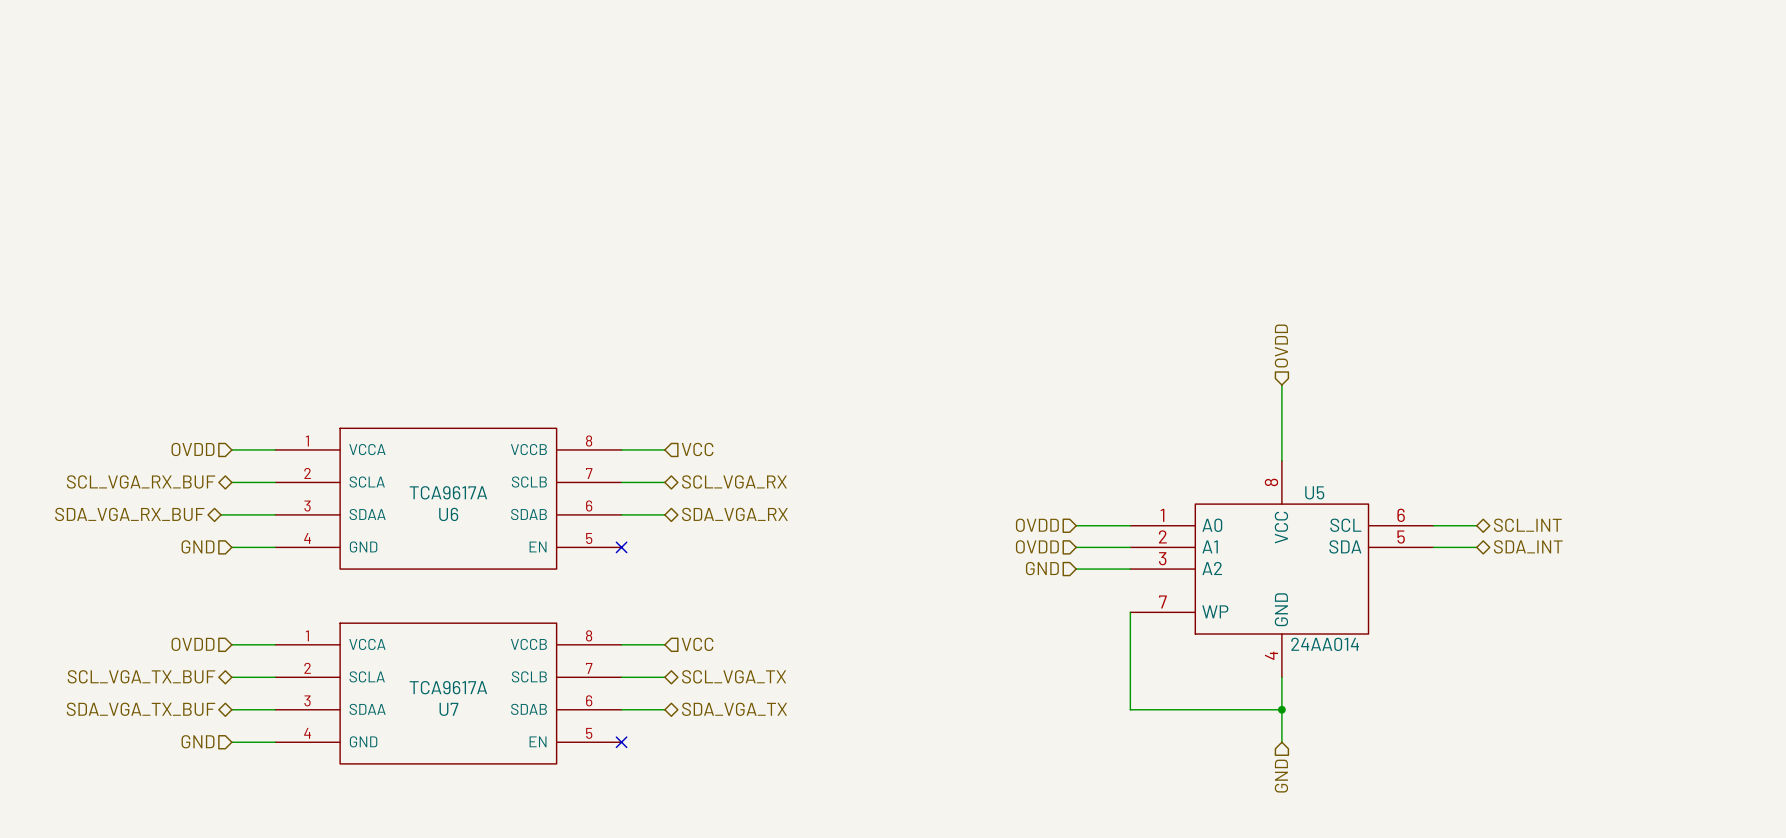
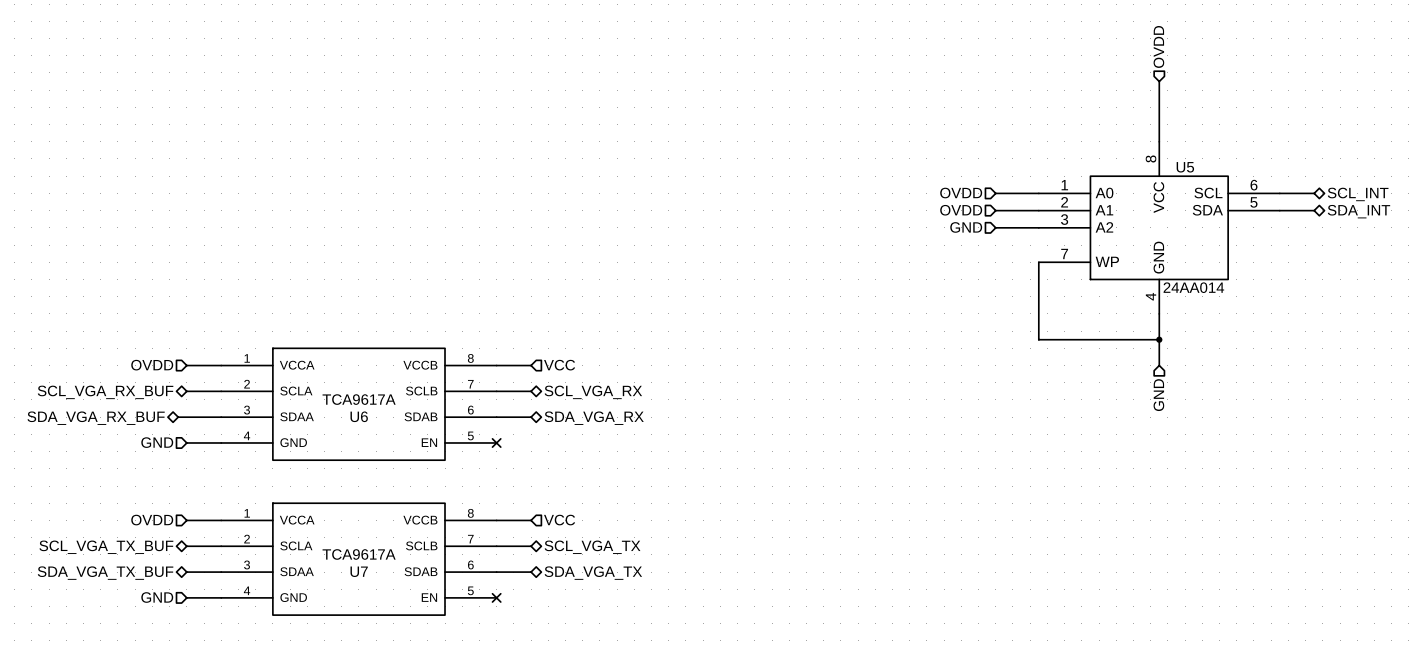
hierarchical label: none -> OVDD (1158, 46)
wire: none -> (1159, 81) (1159, 141)
hierarchical label: none -> OVDD (961, 193)
hierarchical label: none -> SCL_INT (1358, 194)
wire: none -> (995, 193) (1038, 193)
wire: none -> (1279, 193) (1314, 193)
hierarchical label: none -> OVDD (961, 210)
hierarchical label: none -> SDA_INT (1358, 211)
wire: none -> (995, 210) (1038, 210)
wire: none -> (1279, 210) (1314, 210)
hierarchical label: none -> GND (966, 227)
wire: none -> (995, 227) (1038, 227)
wire: none -> (1038, 262) (1038, 339) (1159, 339)
hierarchical label: OVDD (1281, 345) -> none
wire: (1281, 385) (1281, 460) -> none
wire: none -> (1159, 313) (1159, 365)
junction: none -> (1159, 339)
hierarchical label: none -> GND (1158, 395)
hierarchical label: OVDD (1037, 525) -> none
wire: (1076, 525) (1130, 525) -> none
wire: (1433, 525) (1476, 525) -> none
hierarchical label: SCL_INT (1527, 525) -> none
hierarchical label: OVDD (1037, 546) -> none
hierarchical label: SDA_INT (1528, 546) -> none
wire: (1076, 547) (1130, 547) -> none
wire: (1433, 547) (1476, 547) -> none
hierarchical label: GND (1042, 568) -> none
wire: (1076, 569) (1130, 569) -> none
U5 position: (1281, 569) -> (1159, 227)
wire: (1130, 612) (1130, 709) (1281, 709) -> none
wire: (1281, 677) (1281, 742) -> none
junction: (1281, 709) -> none
hierarchical label: GND (1281, 776) -> none

